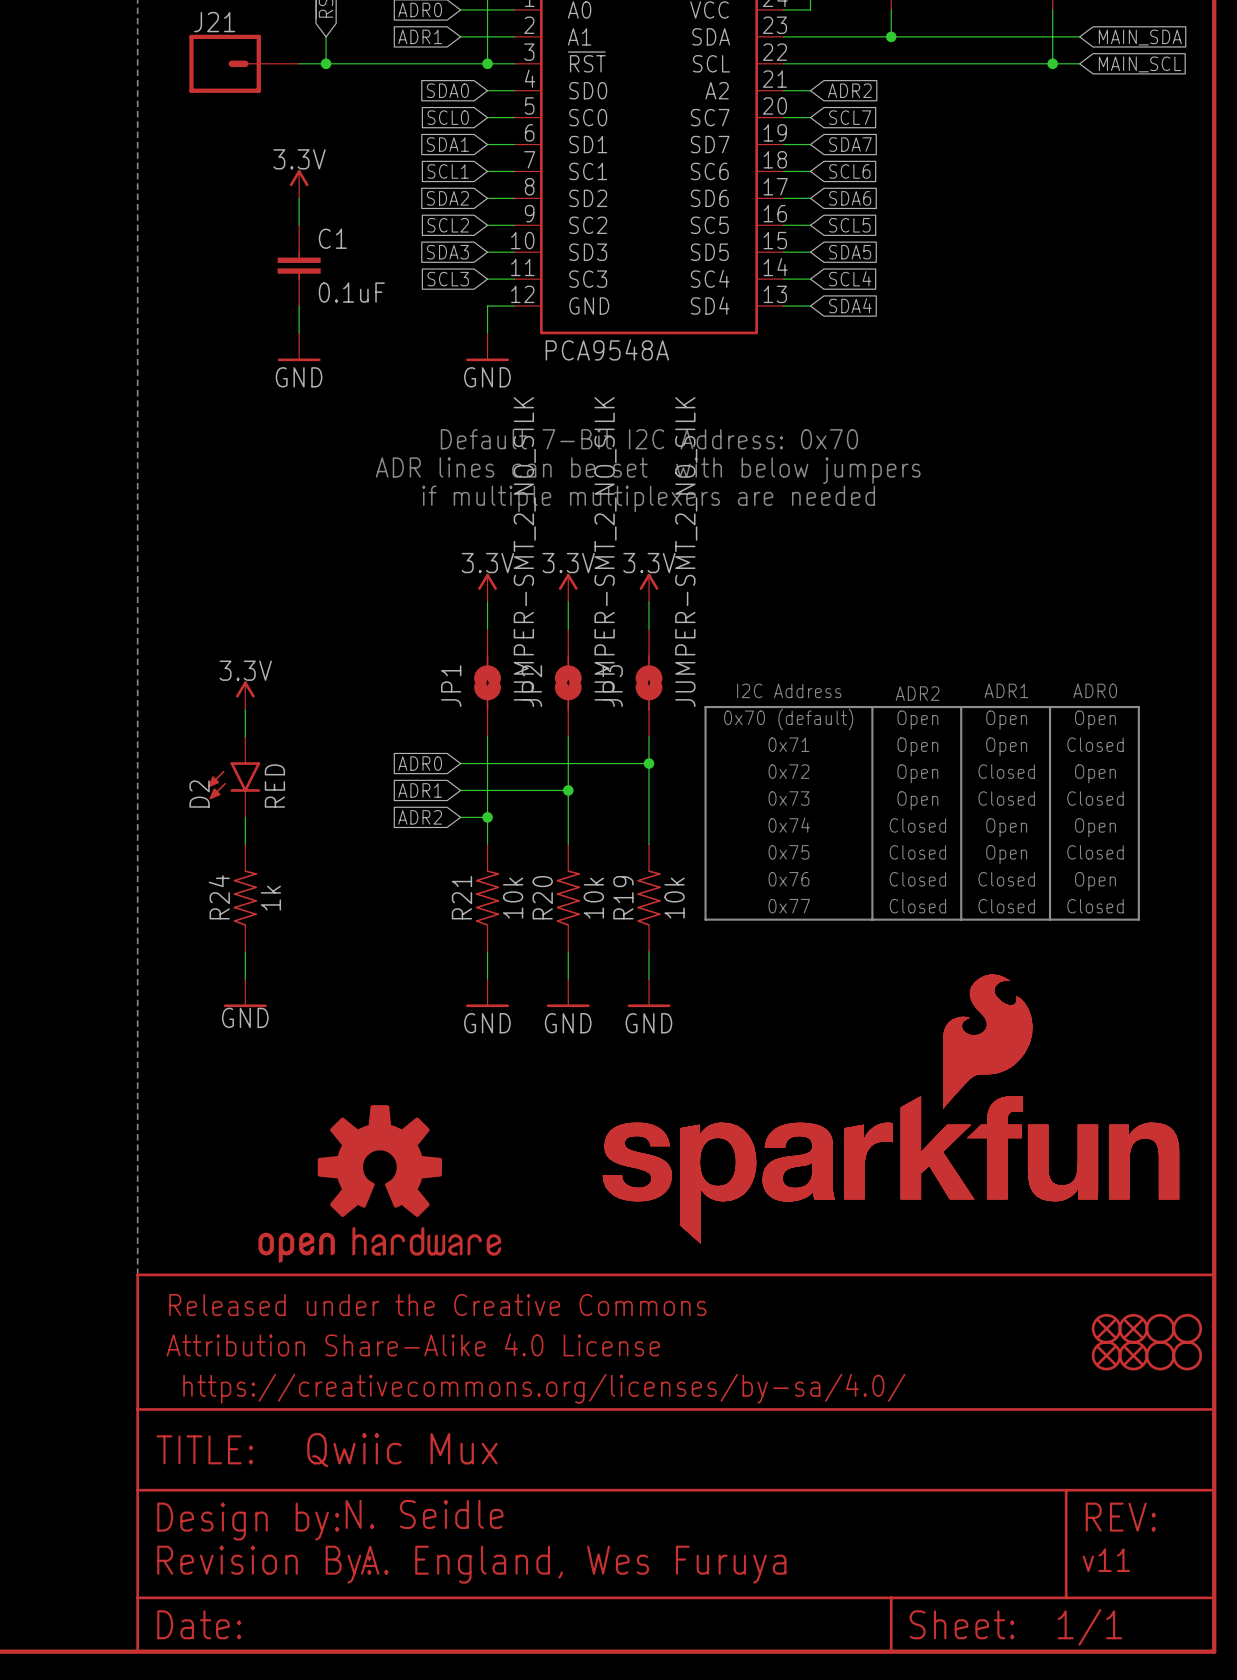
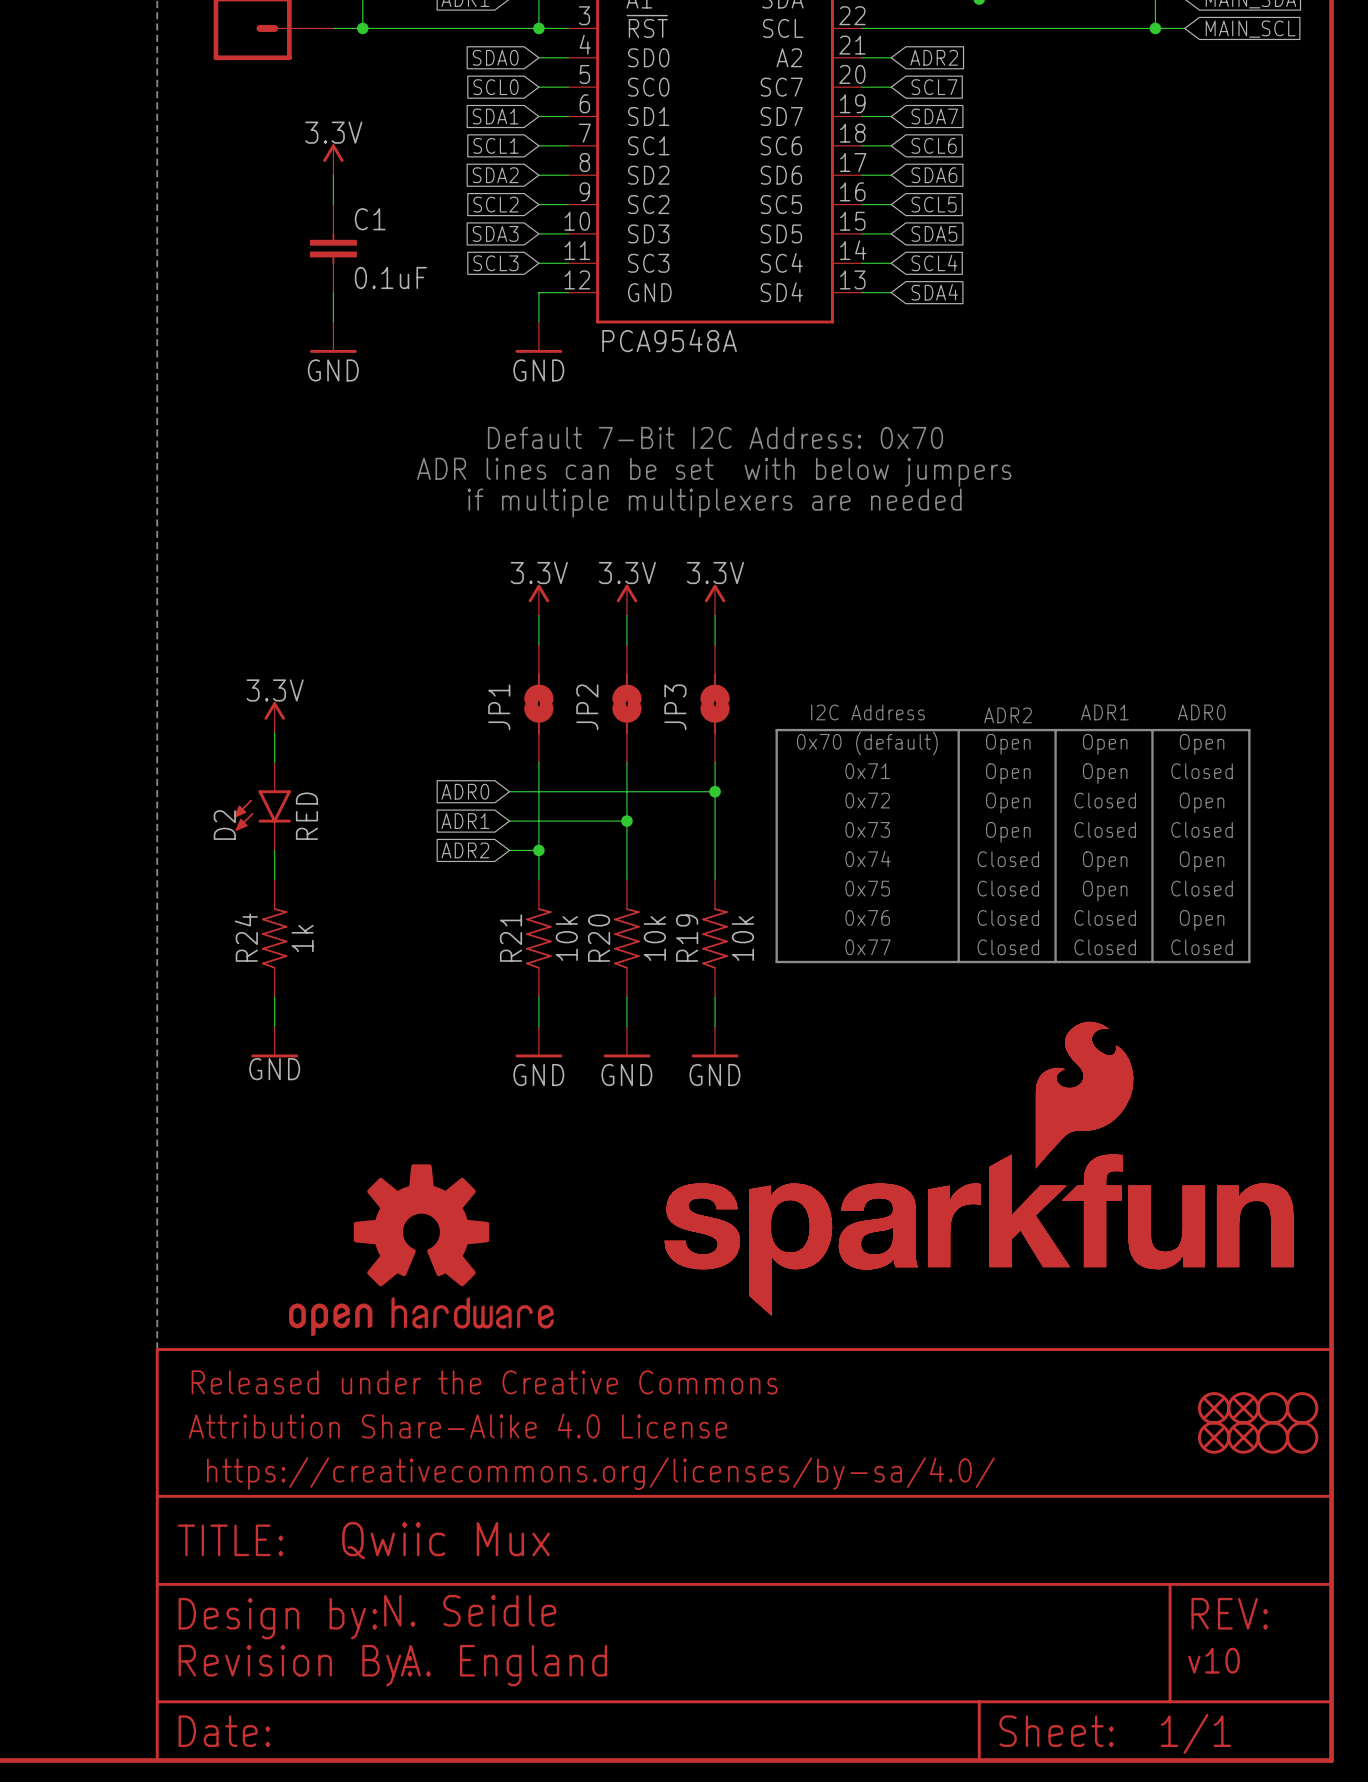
JP1 value: JUMPER-SMT_2_NO_SILK (524, 552) -> none
JP2 value: JUMPER-SMT_2_NO_SILK (605, 552) -> none
JP3 value: JUMPER-SMT_2_NO_SILK (686, 552) -> none
text: v11 (1106, 1560) -> v10 (1213, 1660)
text: A. England, Wes Furuya (573, 1564) -> A. England (503, 1665)

